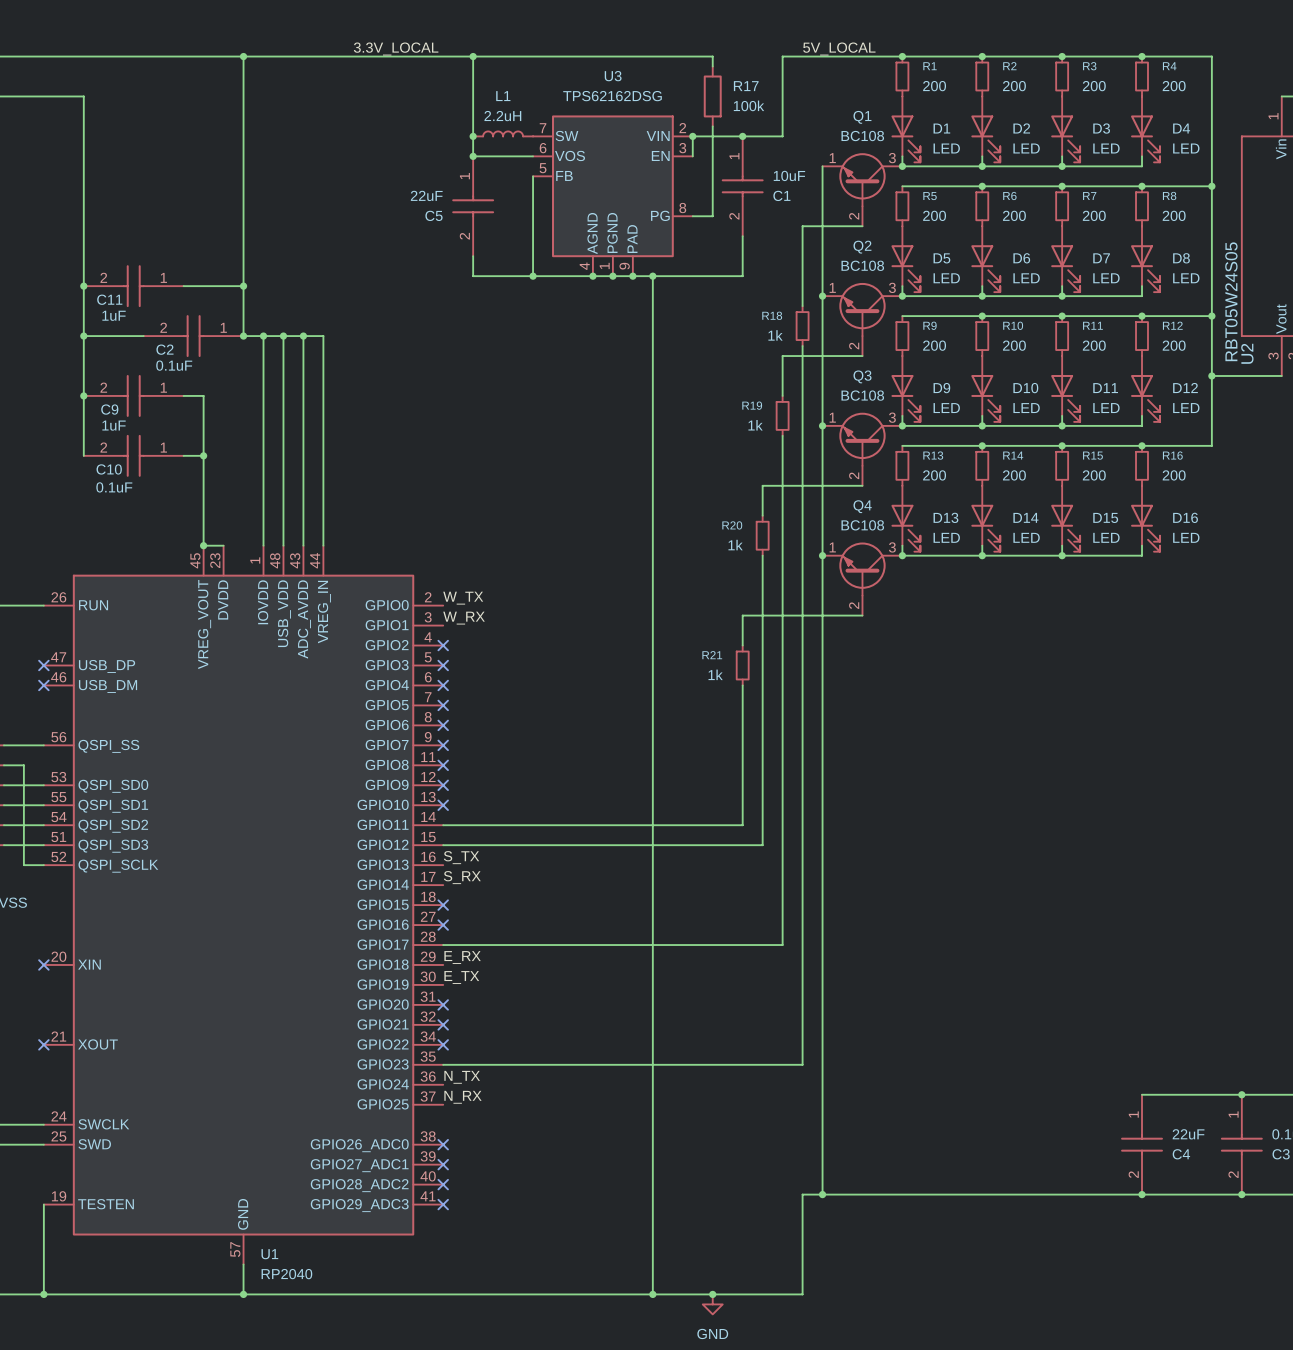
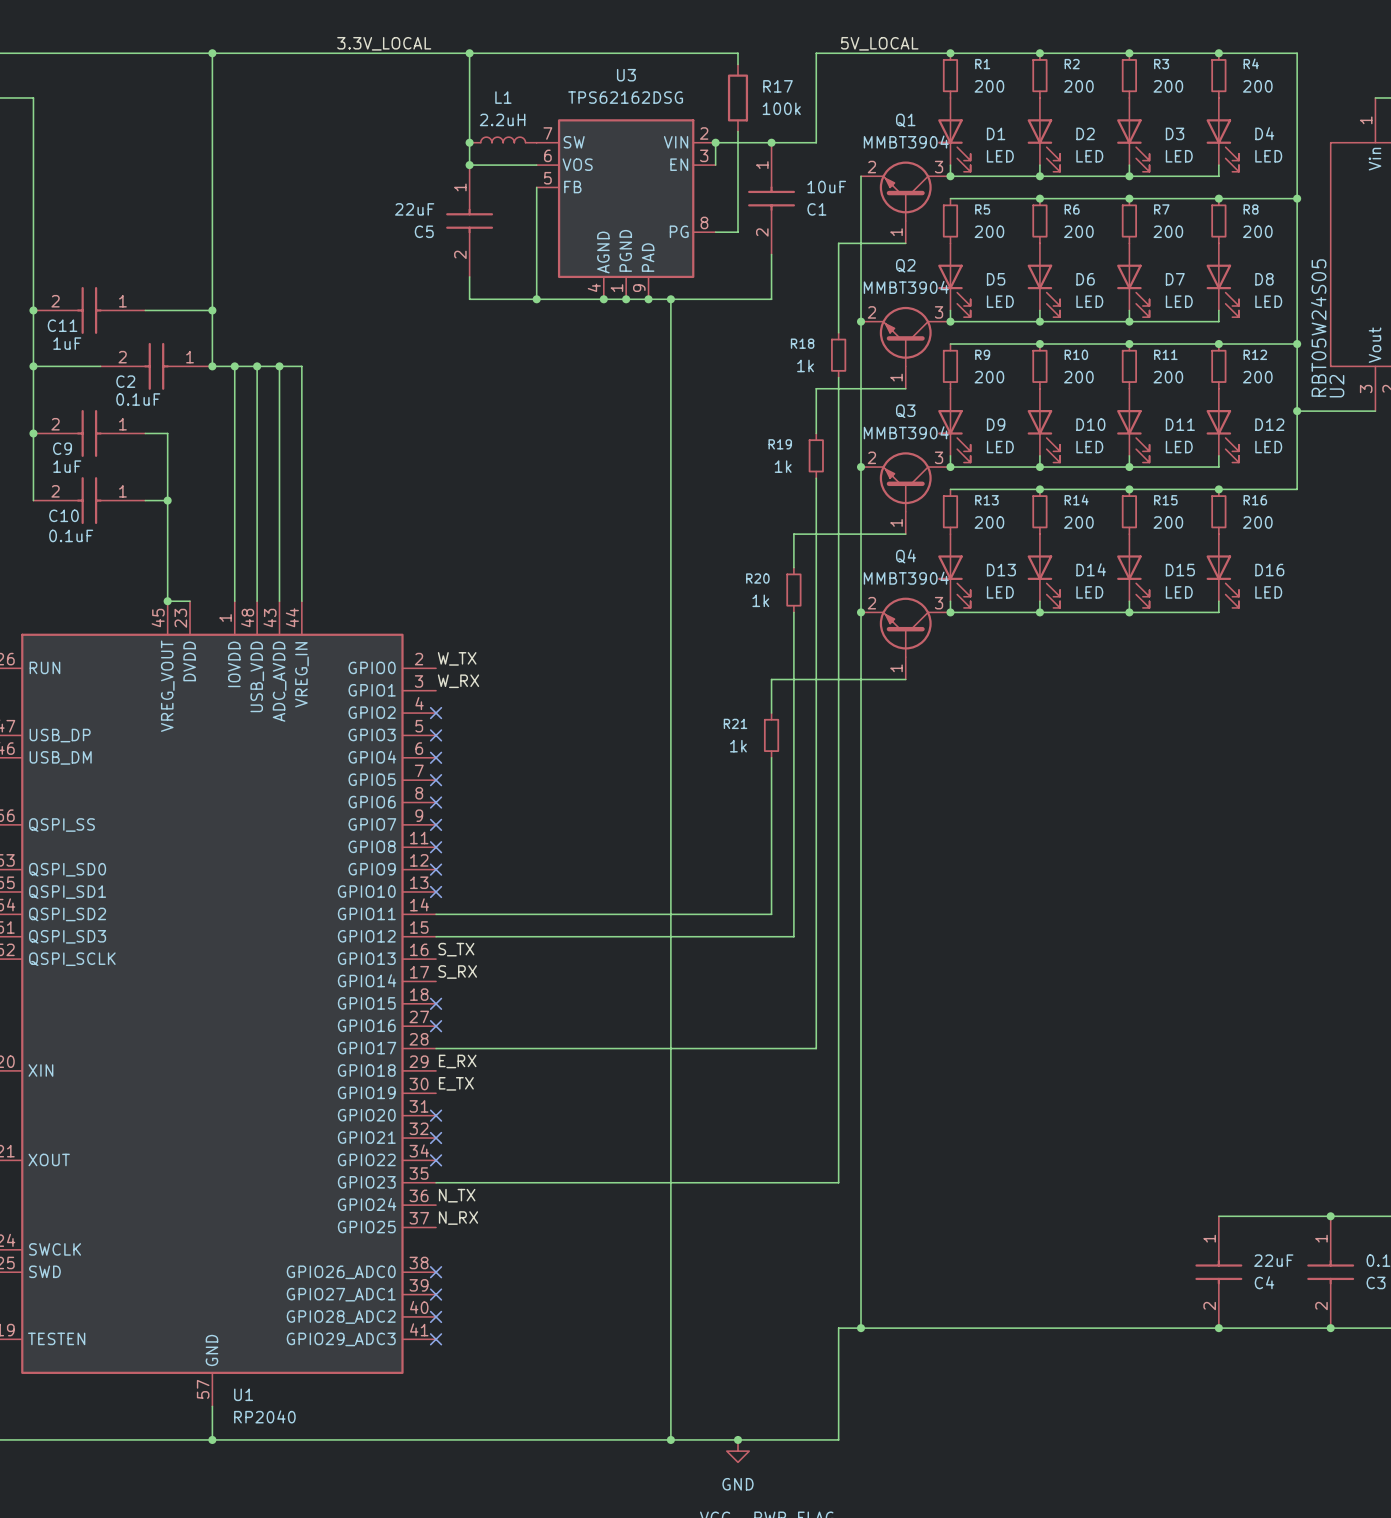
Q1 value: BC108 (862, 136) -> MMBT3904 (906, 142)
Q1 pin number: 1 (832, 158) -> 2 (871, 167)
Q1 pin number: 2 (854, 216) -> 1 (896, 232)
Q2 value: BC108 (862, 265) -> MMBT3904 (906, 287)
Q2 pin number: 1 (832, 287) -> 2 (871, 312)
Q2 pin number: 2 (854, 346) -> 1 (896, 377)
Q3 value: BC108 (862, 395) -> MMBT3904 (906, 432)
Q3 pin number: 1 (832, 417) -> 2 (871, 457)
Q3 pin number: 2 (854, 475) -> 1 (896, 522)
Q4 value: BC108 (862, 525) -> MMBT3904 (906, 578)
Q4 pin number: 1 (832, 547) -> 2 (871, 603)
Q4 pin number: 2 (854, 605) -> 1 (896, 668)

